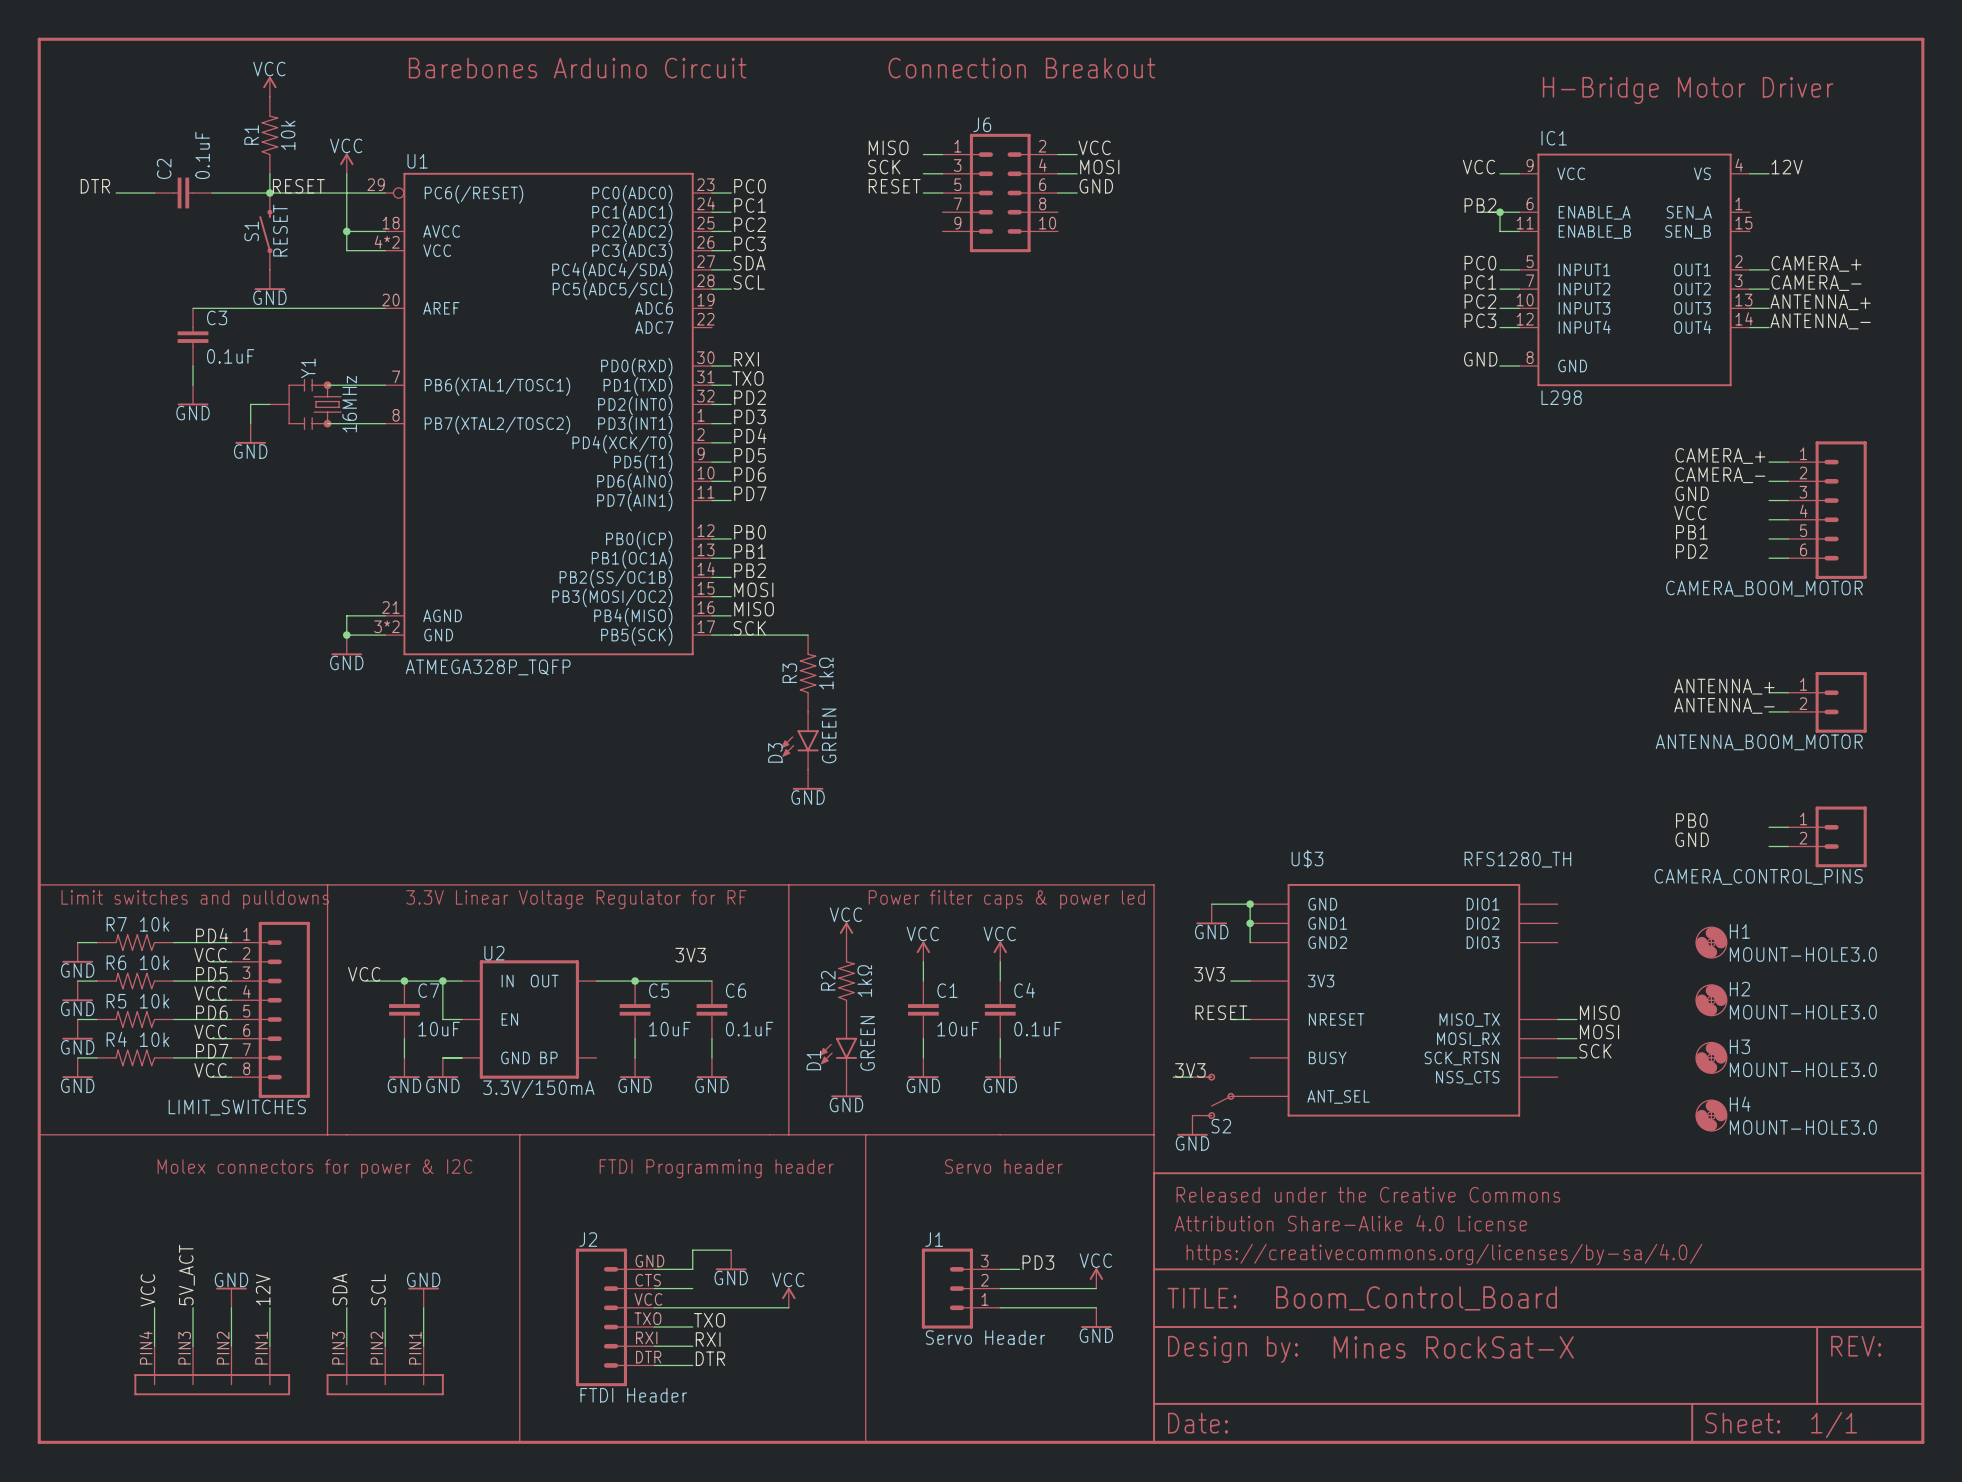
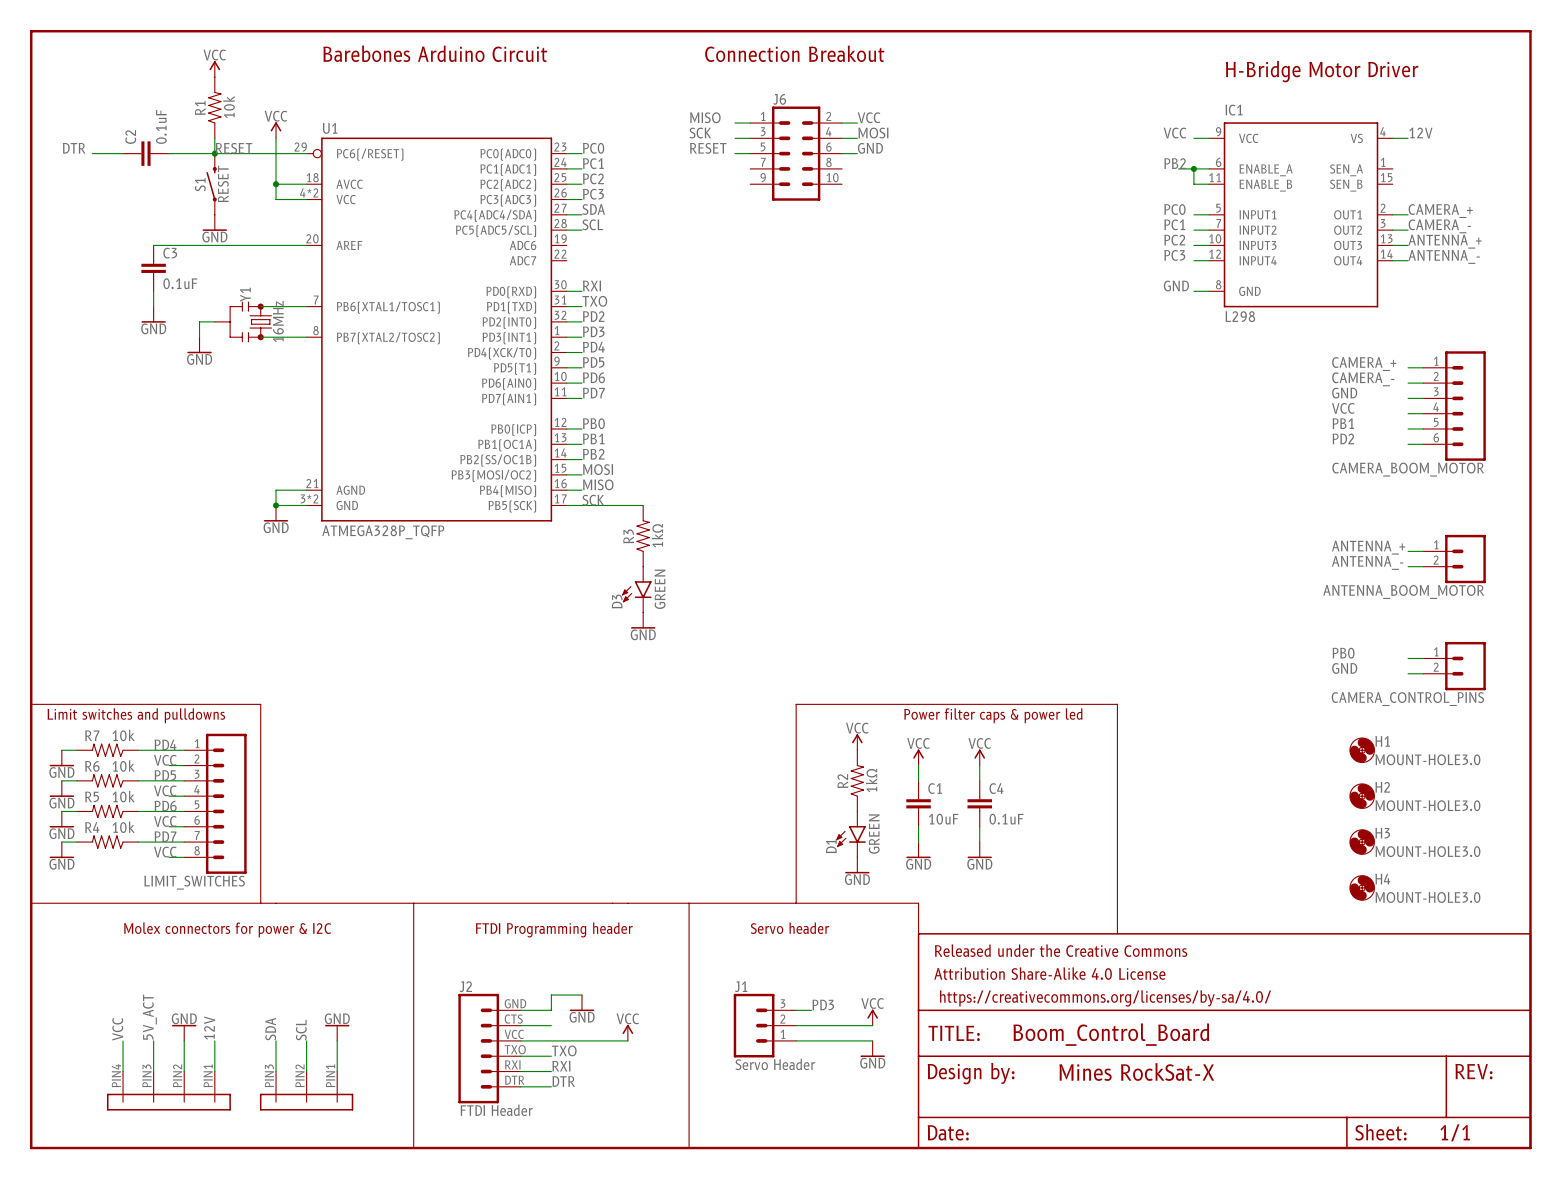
line: (327, 884) (1000, 884) -> (796, 903) (796, 704)
line: (788, 884) (788, 1134) -> none
line: (1154, 884) (1154, 1134) -> (918, 704) (1117, 704) (1117, 933)
text: 3.3V Linear Voltage Regulator for RF (576, 899) -> none
text: Power filter caps & power led (1006, 899) -> none
text: none -> Power filter caps & power led (993, 715)
wire: (1211, 904) (1250, 904) (1250, 942) -> none
junction: (1250, 904) -> none
power symbol: GND (1211, 914) -> none
junction: (1250, 923) -> none
power symbol: VCC (846, 932) -> none
power symbol: none -> VCC (857, 742)
power symbol: VCC (923, 951) -> none
power symbol: VCC (1000, 951) -> none
power symbol: none -> VCC (918, 757)
power symbol: none -> VCC (979, 757)
label: 3V3 (690, 955) -> none
wire: (923, 961) (923, 981) -> none
label: VCC (364, 974) -> none
label: 3V3 (1209, 974) -> none
wire: (365, 981) (462, 981) -> none
junction: (404, 981) -> none
wire: (442, 981) (442, 1019) (462, 1019) -> none
junction: (442, 981) -> none
wire: (596, 981) (711, 981) -> none
junction: (635, 981) -> none
R2 position: (846, 981) -> (857, 780)
wire: (1230, 981) (1250, 981) -> (979, 780) (979, 765)
U$3: RFS1280_TH (1403, 1000) -> none
C7: 10uF (404, 1009) -> none
C5: 10uF (635, 1009) -> none
C6: 0.1uF (711, 1009) -> none
C1 position: (923, 1009) -> (918, 803)
C4 position: (1000, 1009) -> (979, 803)
label: RESET (1221, 1012) -> none
label: MISO (1599, 1012) -> none
U2: 3.3V/150mA (529, 1019) -> none
wire: (1230, 1019) (1250, 1019) -> none
wire: (1557, 1019) (1576, 1019) -> none
label: MOSI (1599, 1031) -> none
wire: (404, 1038) (404, 1057) -> none
wire: (635, 1038) (635, 1057) -> none
wire: (711, 1038) (711, 1057) -> none
wire: (923, 1038) (923, 1057) -> none
wire: none -> (979, 826) (979, 842)
wire: (1557, 1038) (1576, 1038) -> none
D1 position: (838, 1048) -> (851, 834)
label: SCK (1595, 1051) -> none
wire: (442, 1057) (462, 1057) -> none
wire: (1557, 1057) (1576, 1057) -> none
power symbol: GND (404, 1068) -> none
power symbol: GND (442, 1068) -> none
power symbol: GND (635, 1068) -> none
power symbol: GND (711, 1068) -> none
power symbol: GND (923, 1068) -> none
power symbol: GND (1000, 1068) -> none
power symbol: none -> GND (918, 850)
power symbol: none -> GND (979, 850)
label: 3V3 (1190, 1070) -> none
wire: (1173, 1077) (1192, 1077) -> none
power symbol: GND (846, 1087) -> none
power symbol: none -> GND (857, 865)
S2: (1221, 1096) -> none
power symbol: GND (1192, 1125) -> none

